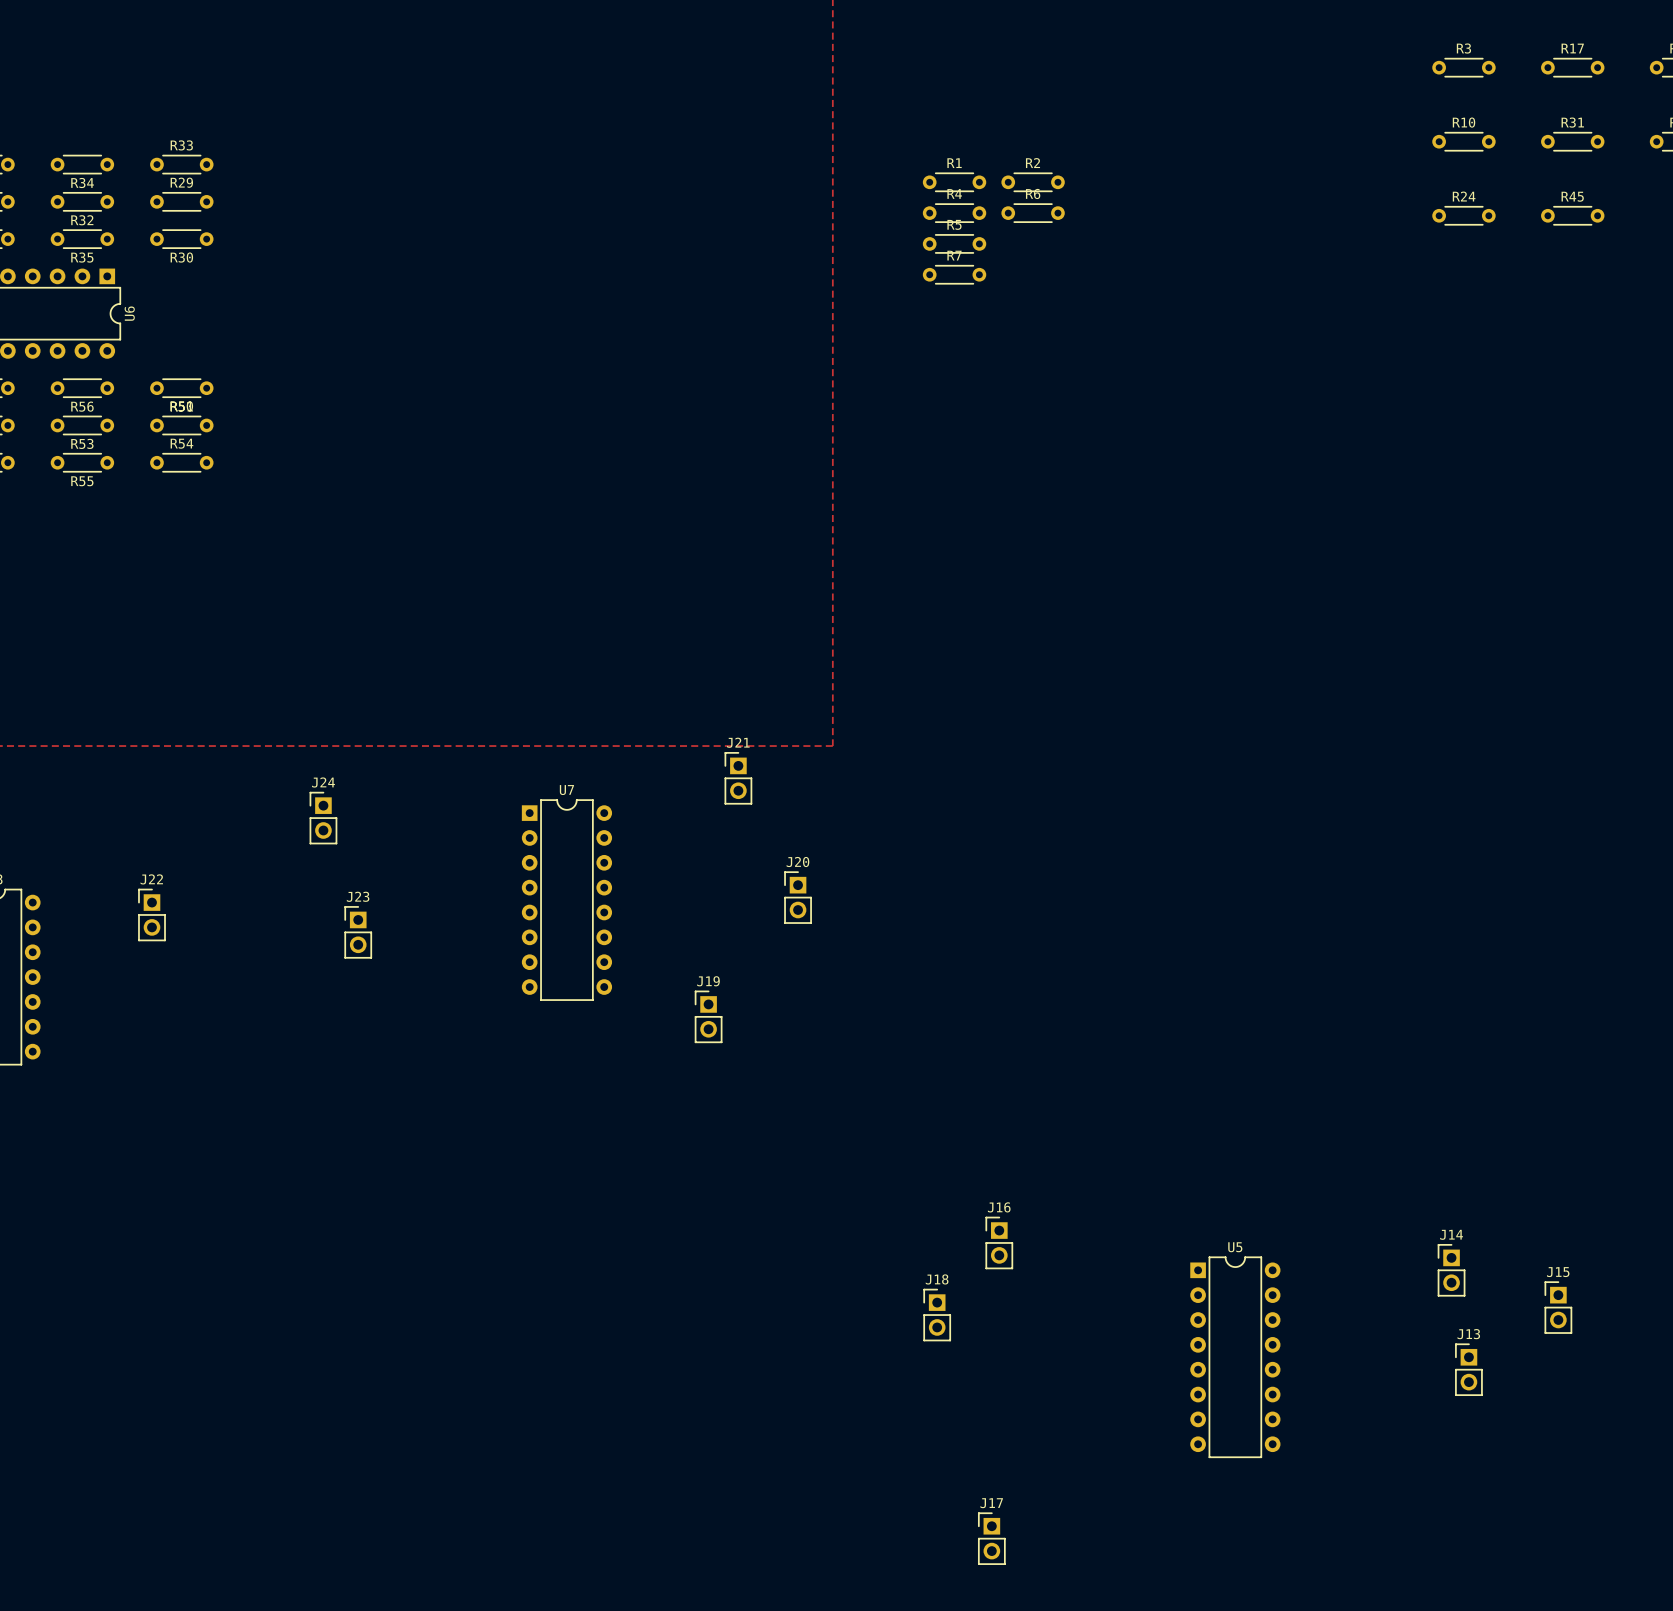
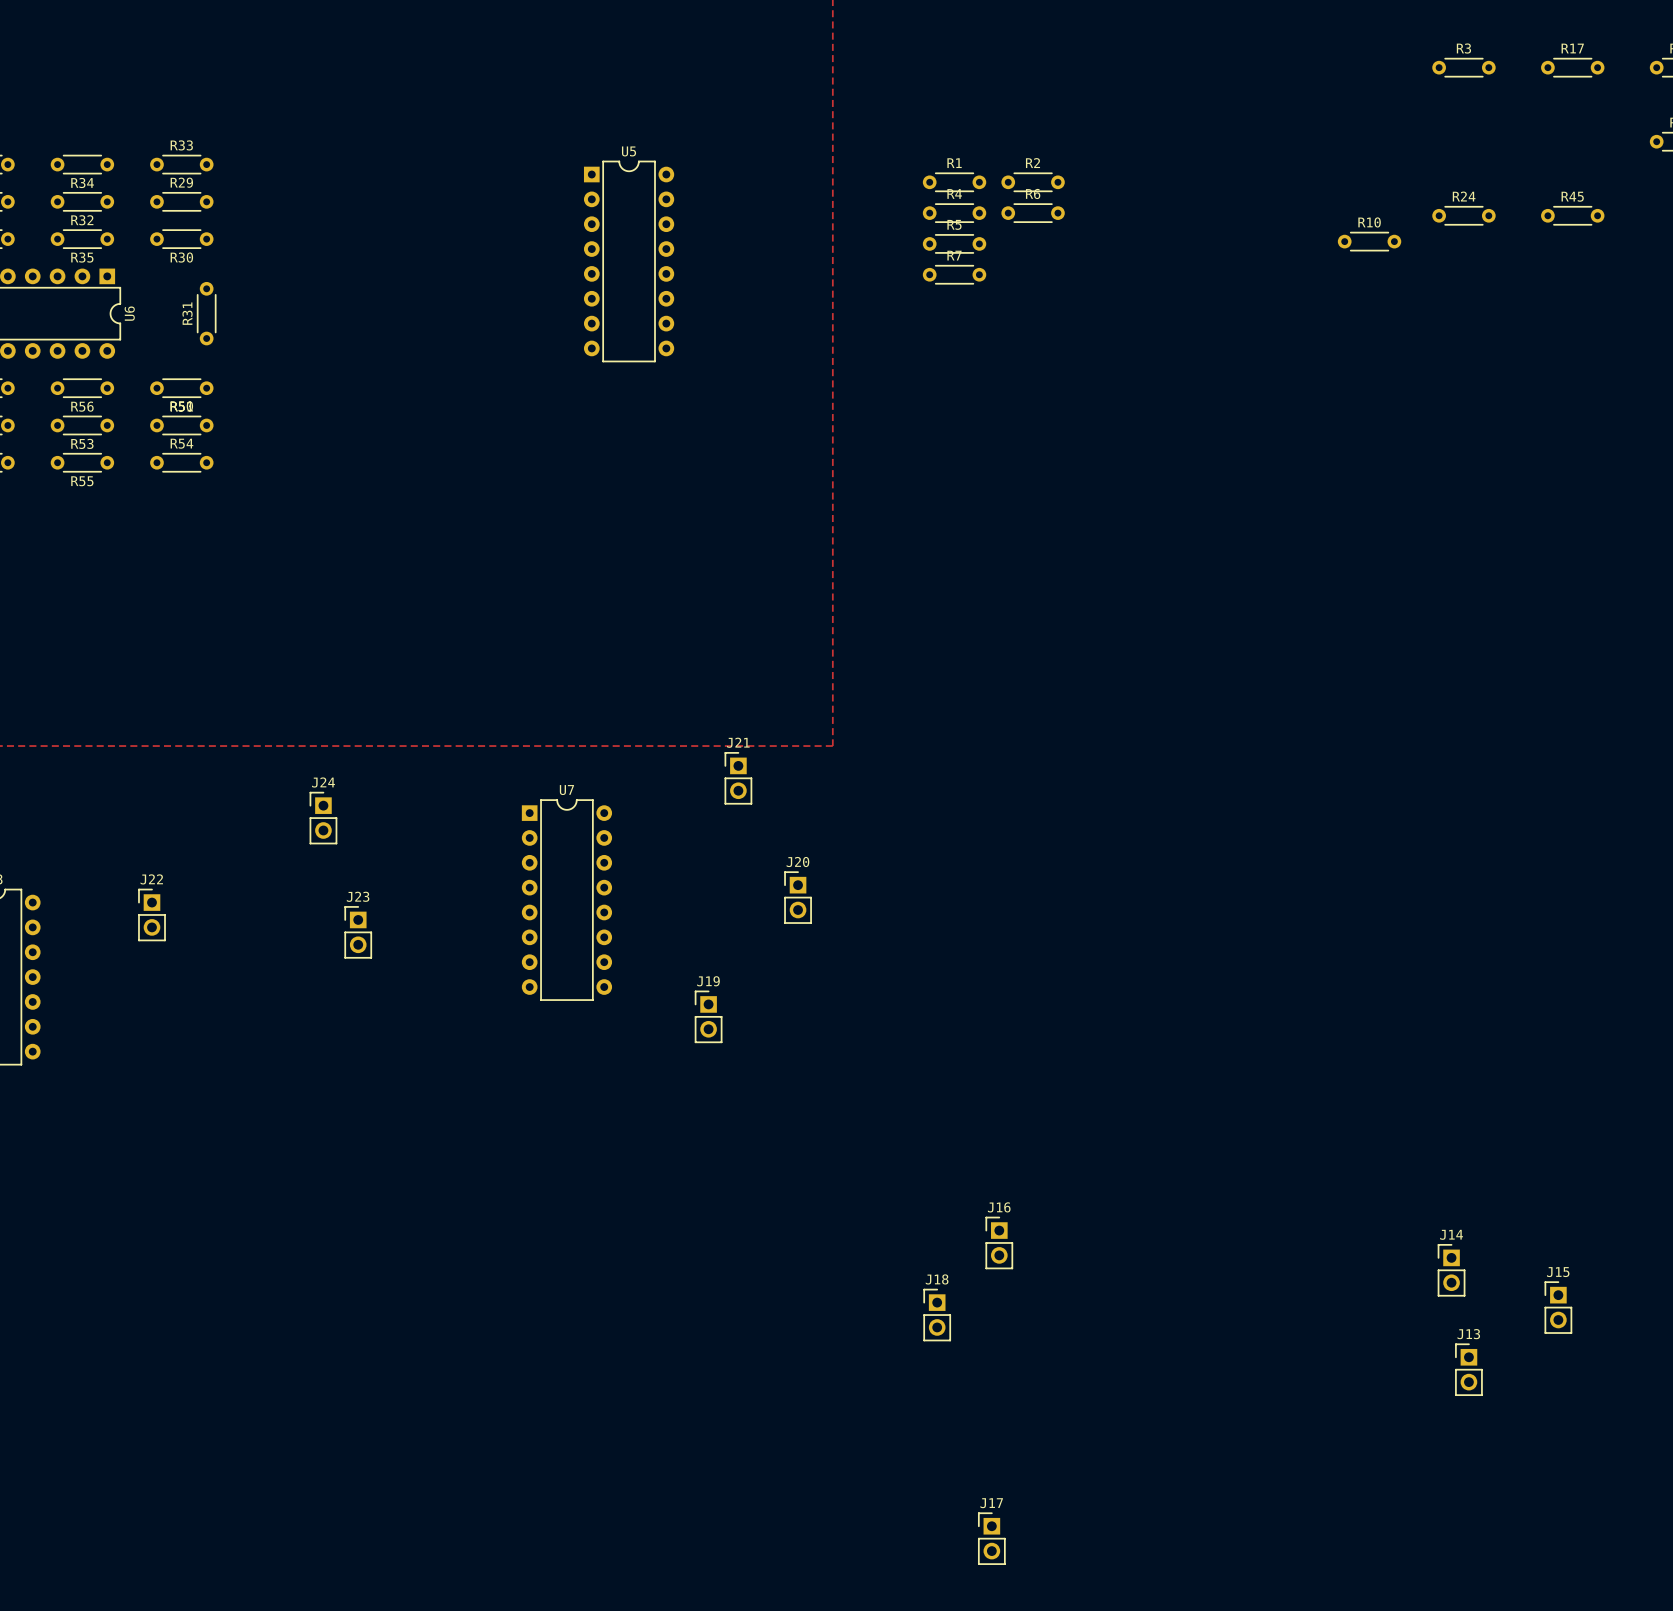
R31 name position: R31 (1572, 122) -> R31 (187, 313)
R10 position: (1463, 141) -> (1369, 241)
R31 rotation: 0° (1572, 141) -> 90° clockwise (206, 313)
R31 position: (1572, 141) -> (206, 313)
U5 position: (1235, 1357) -> (629, 261)

